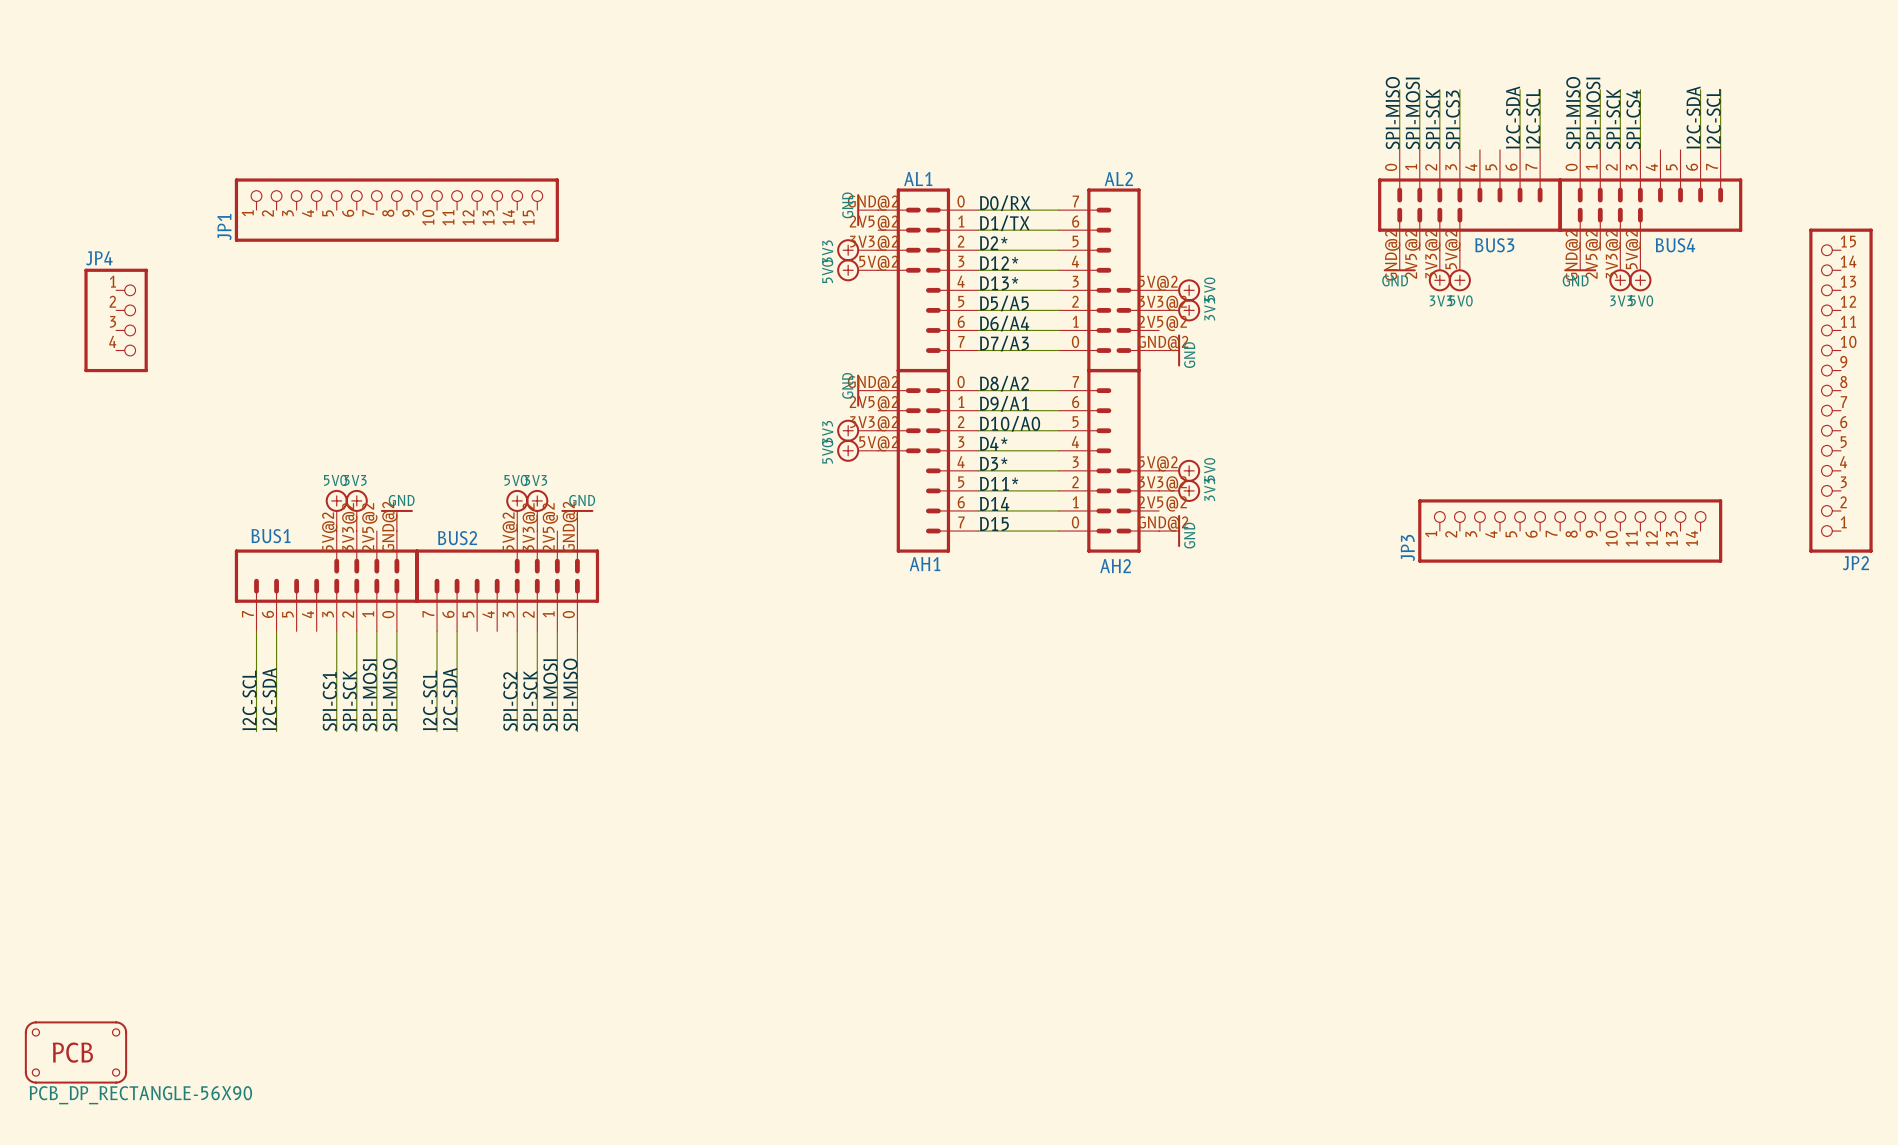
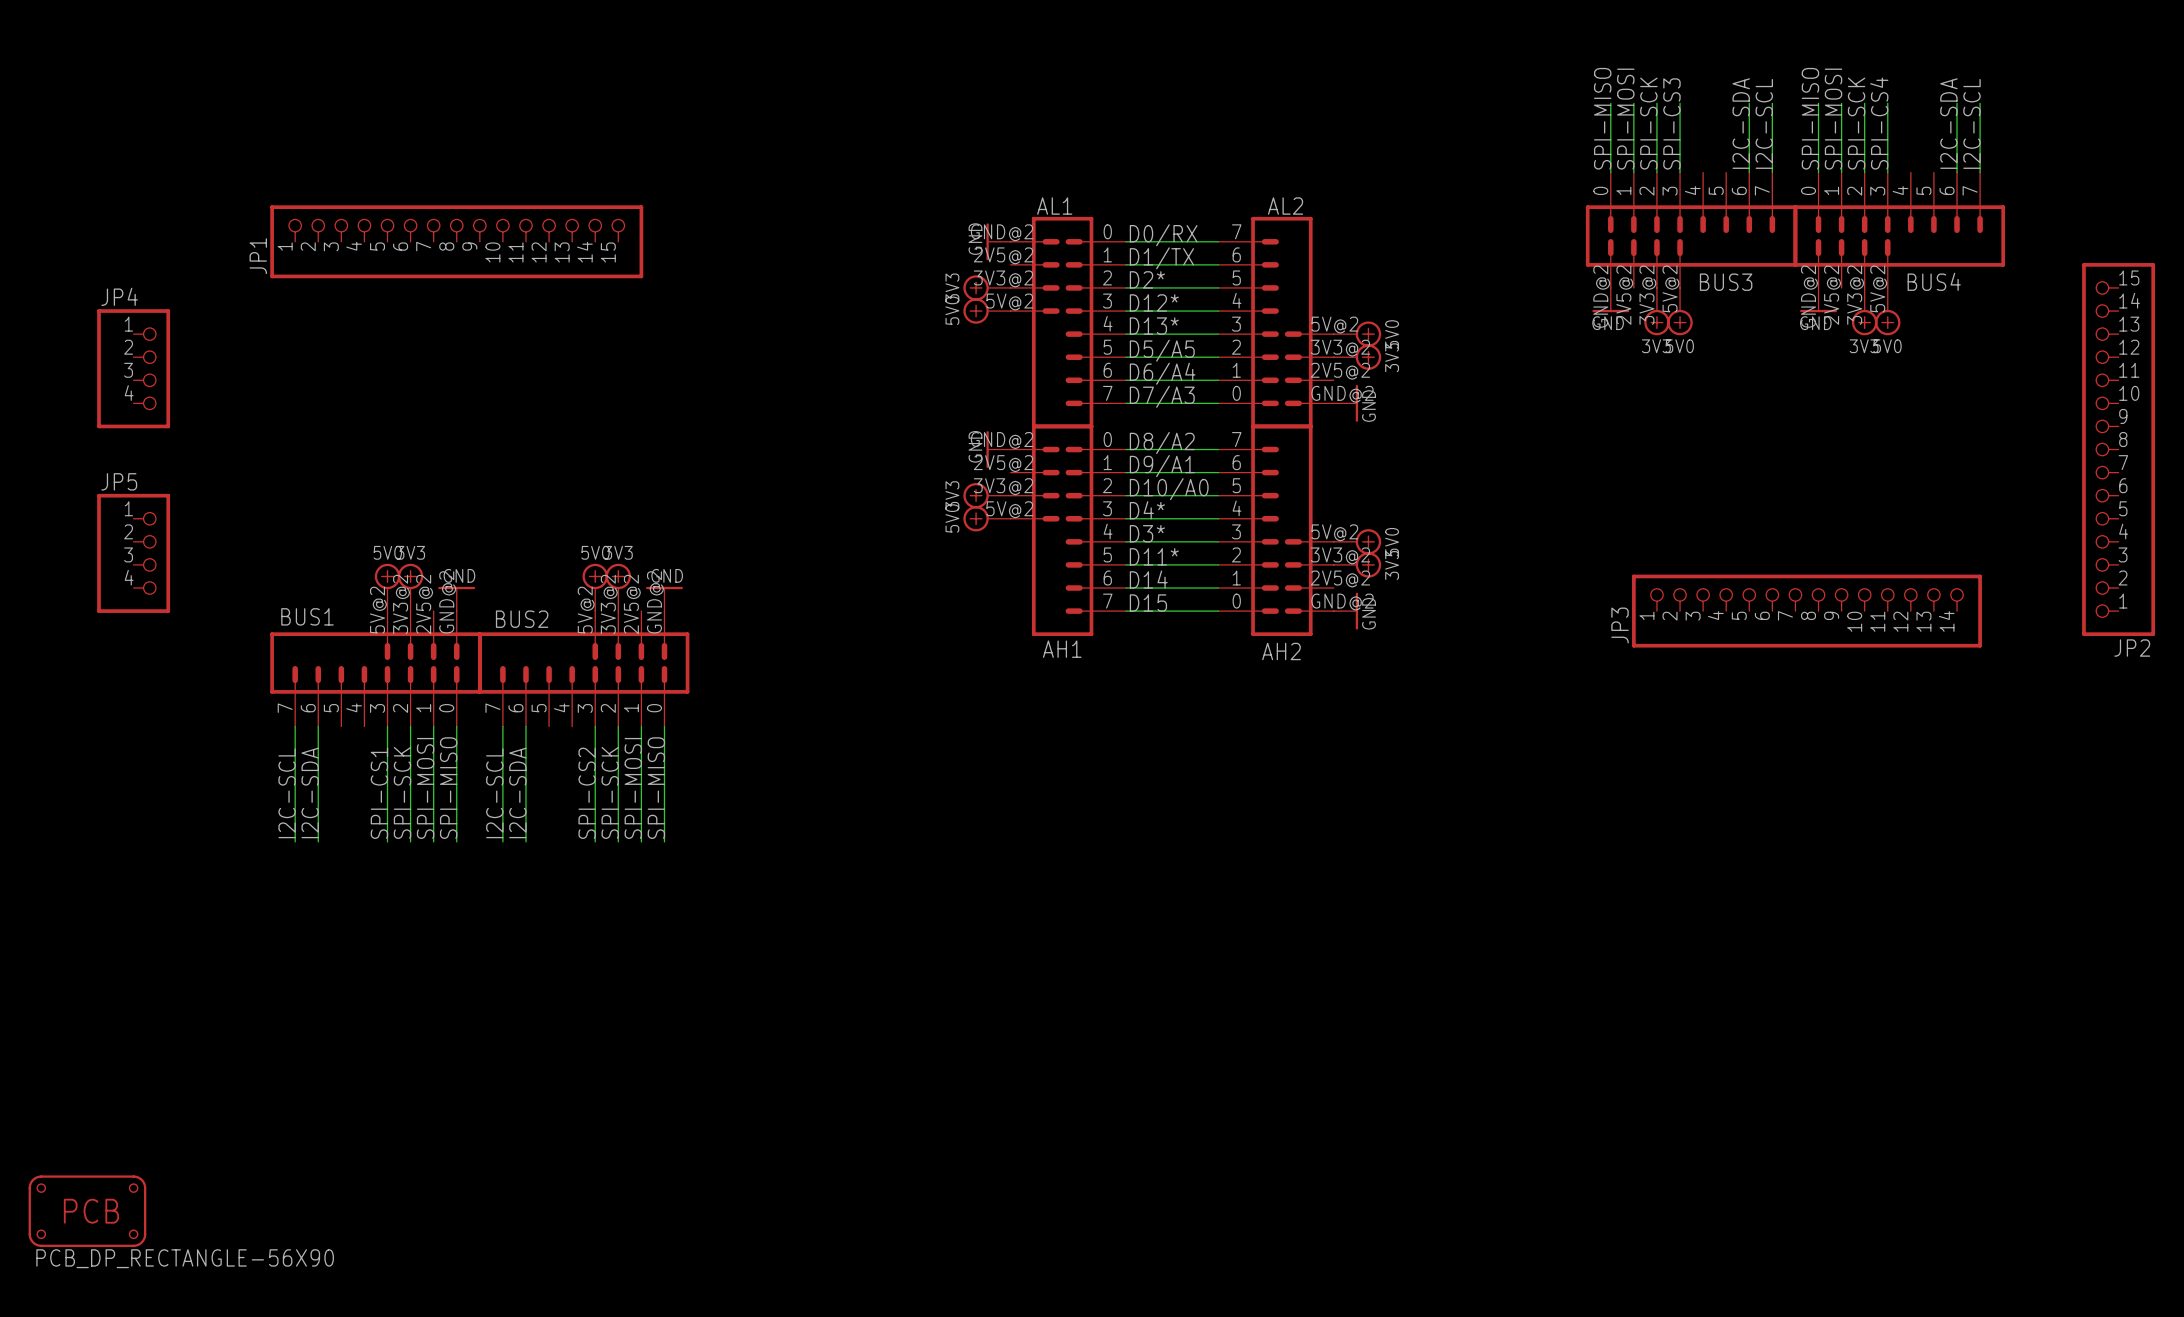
JP5: none -> (133, 553)

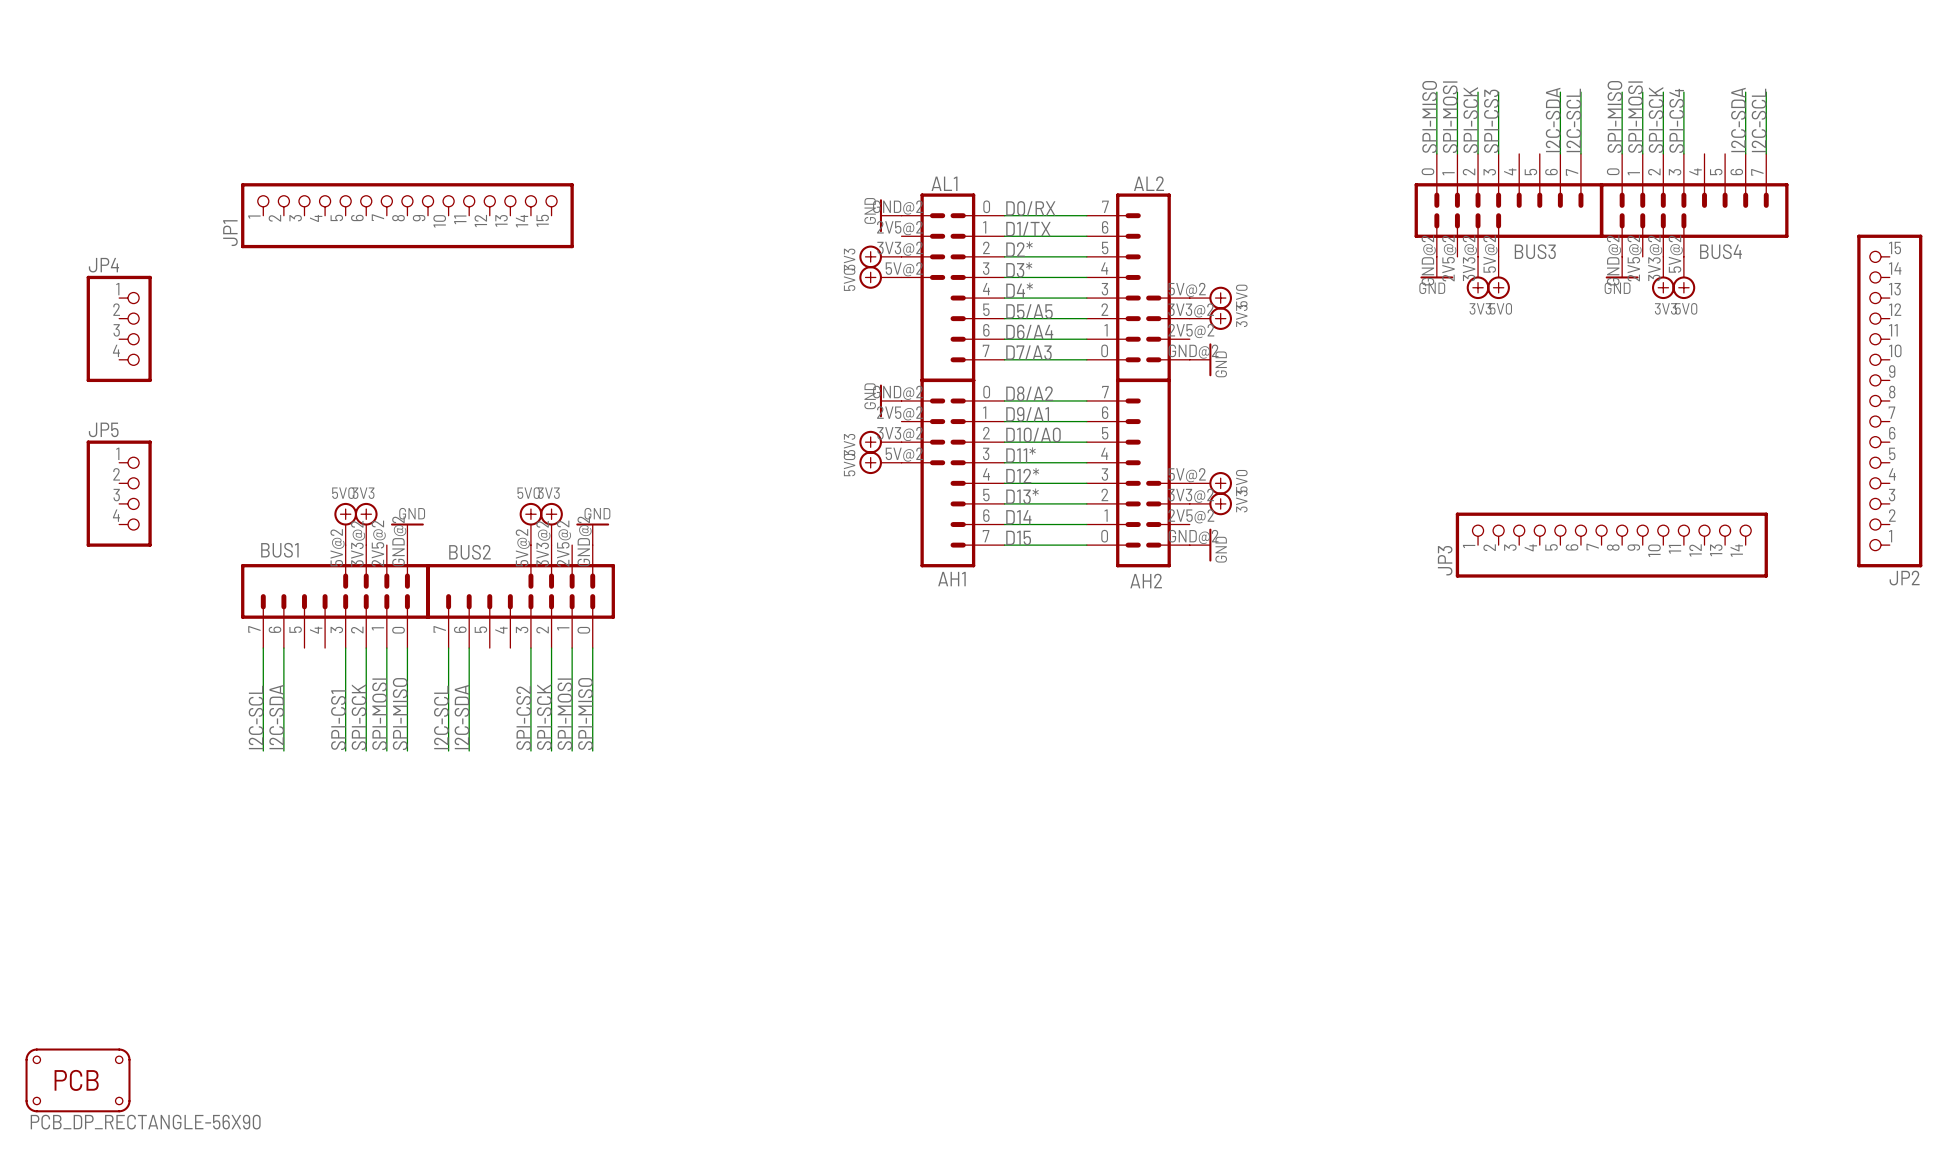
label: D12* (1154, 302) -> D3* (1019, 269)
label: D13* (1154, 326) -> D4* (1019, 290)
label: D4* (1147, 510) -> D11* (1020, 455)
label: D3* (1147, 533) -> D12* (1022, 475)
label: D11* (1154, 556) -> D13* (1022, 496)

